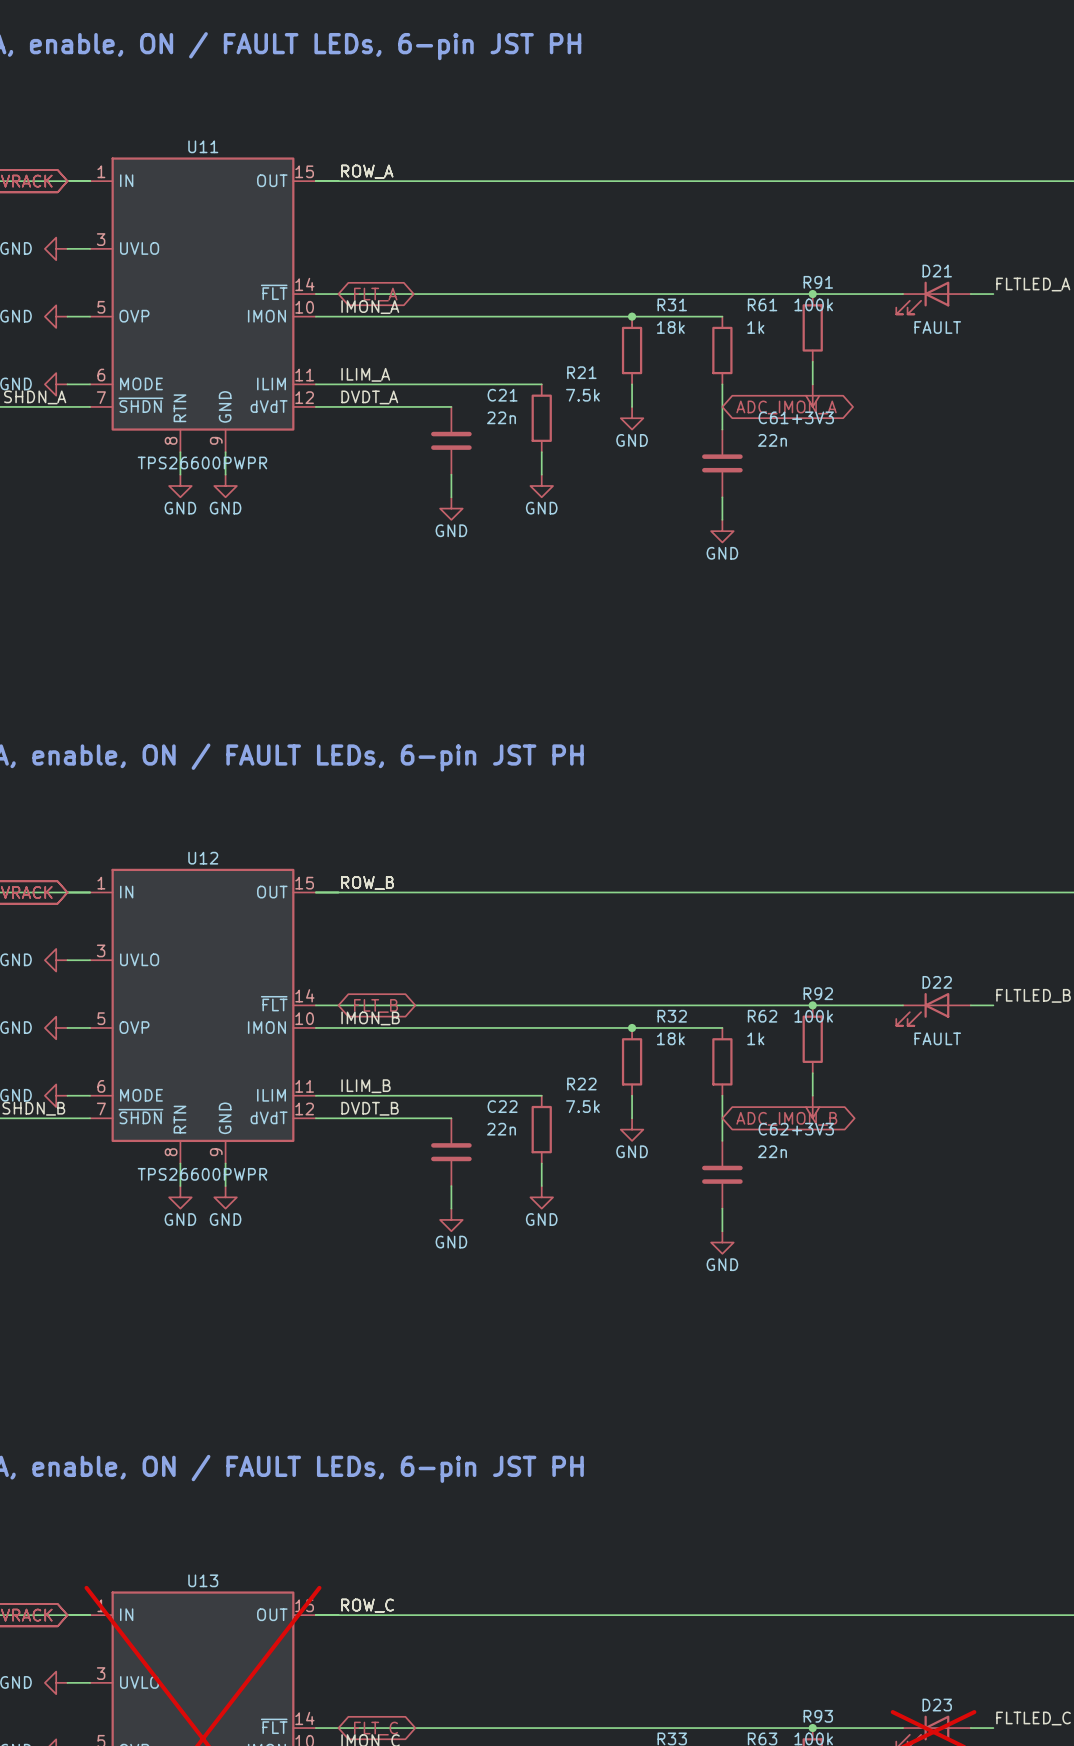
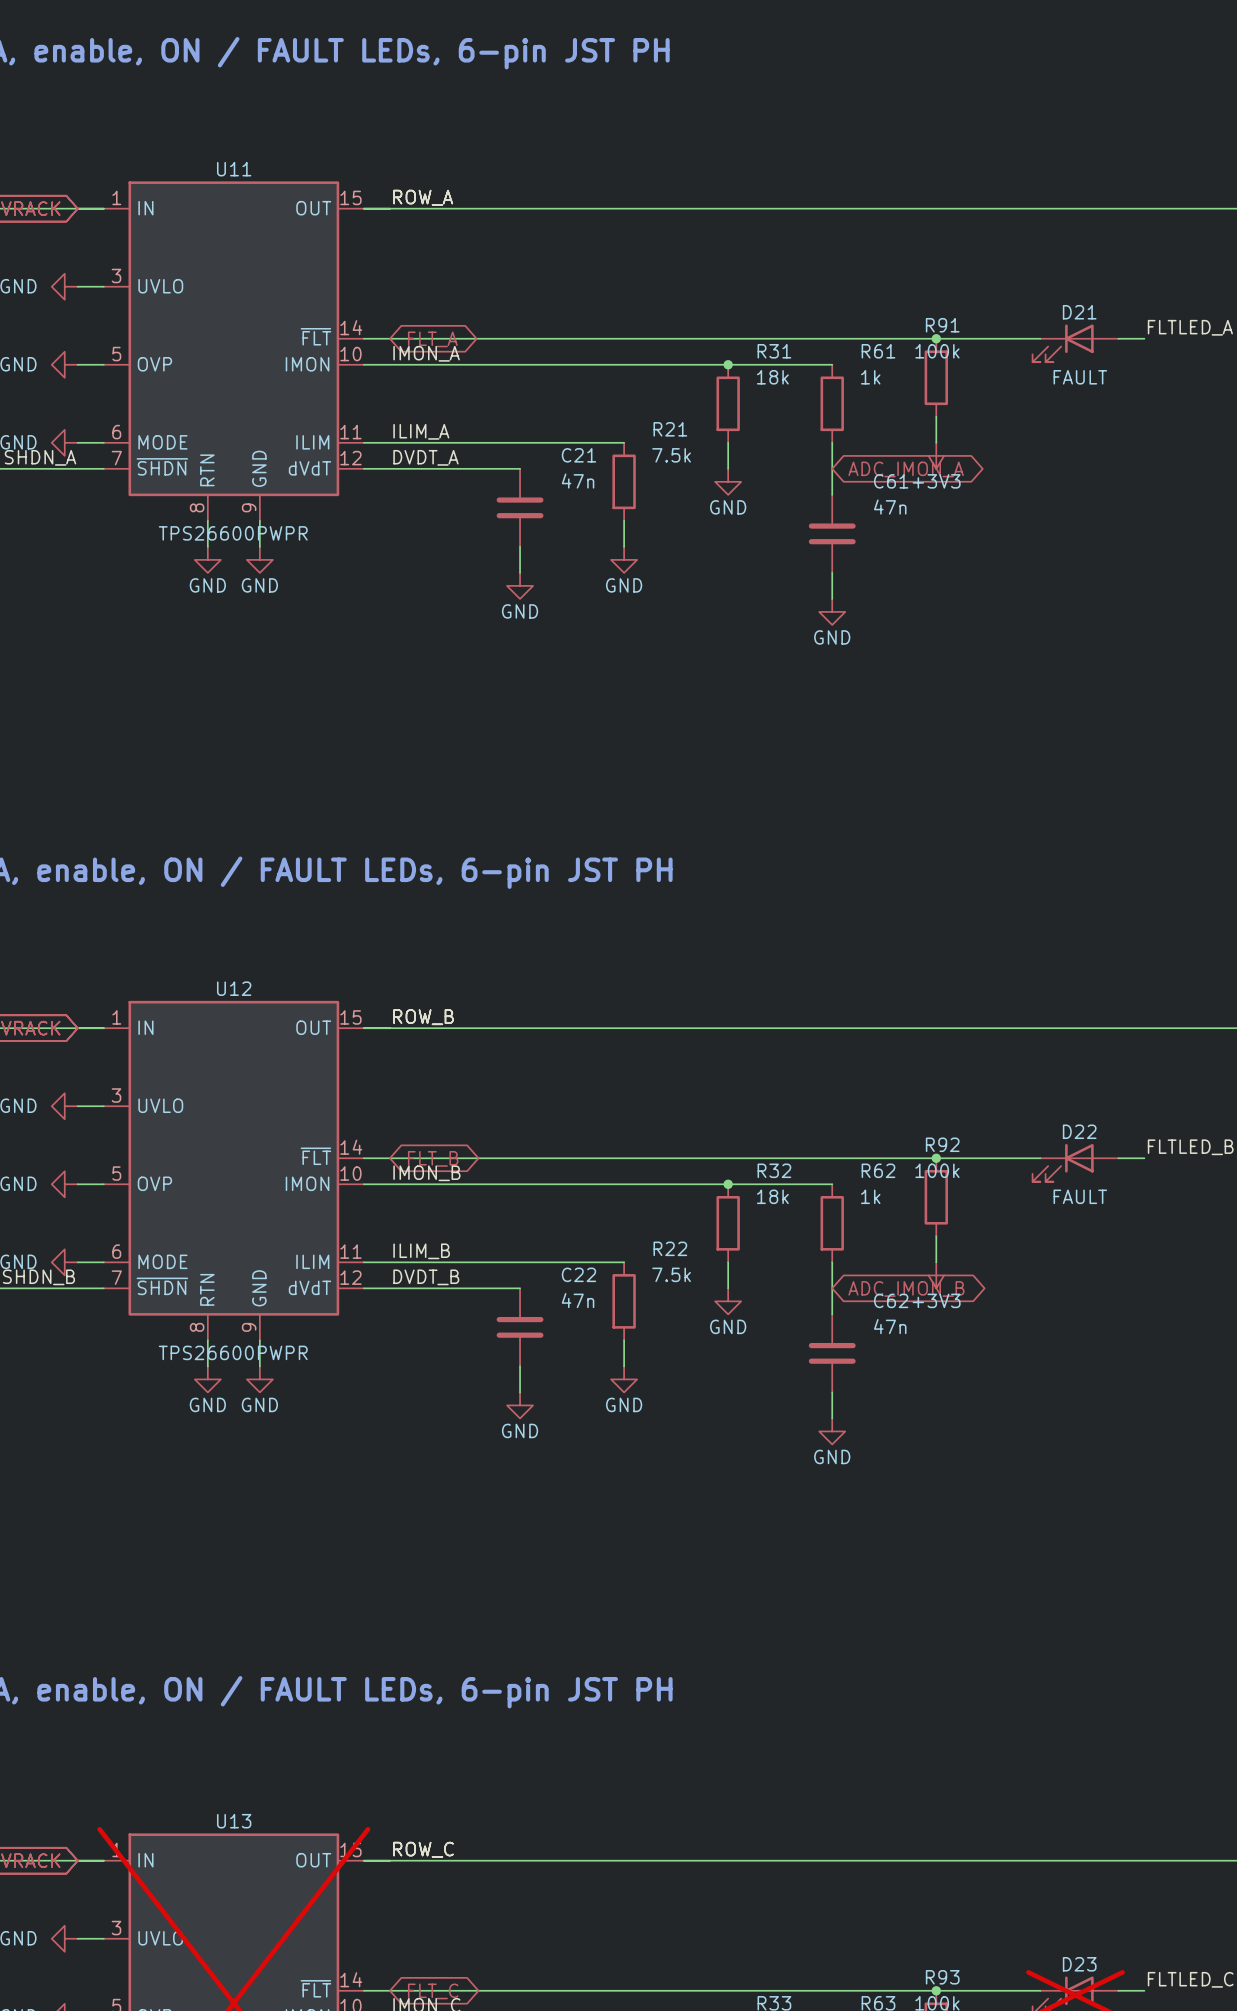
C21 value: 22n (501, 417) -> 47n (578, 481)
C61 value: 22n (772, 440) -> 47n (890, 507)
C22 value: 22n (501, 1129) -> 47n (578, 1300)
C62 value: 22n (772, 1151) -> 47n (890, 1326)

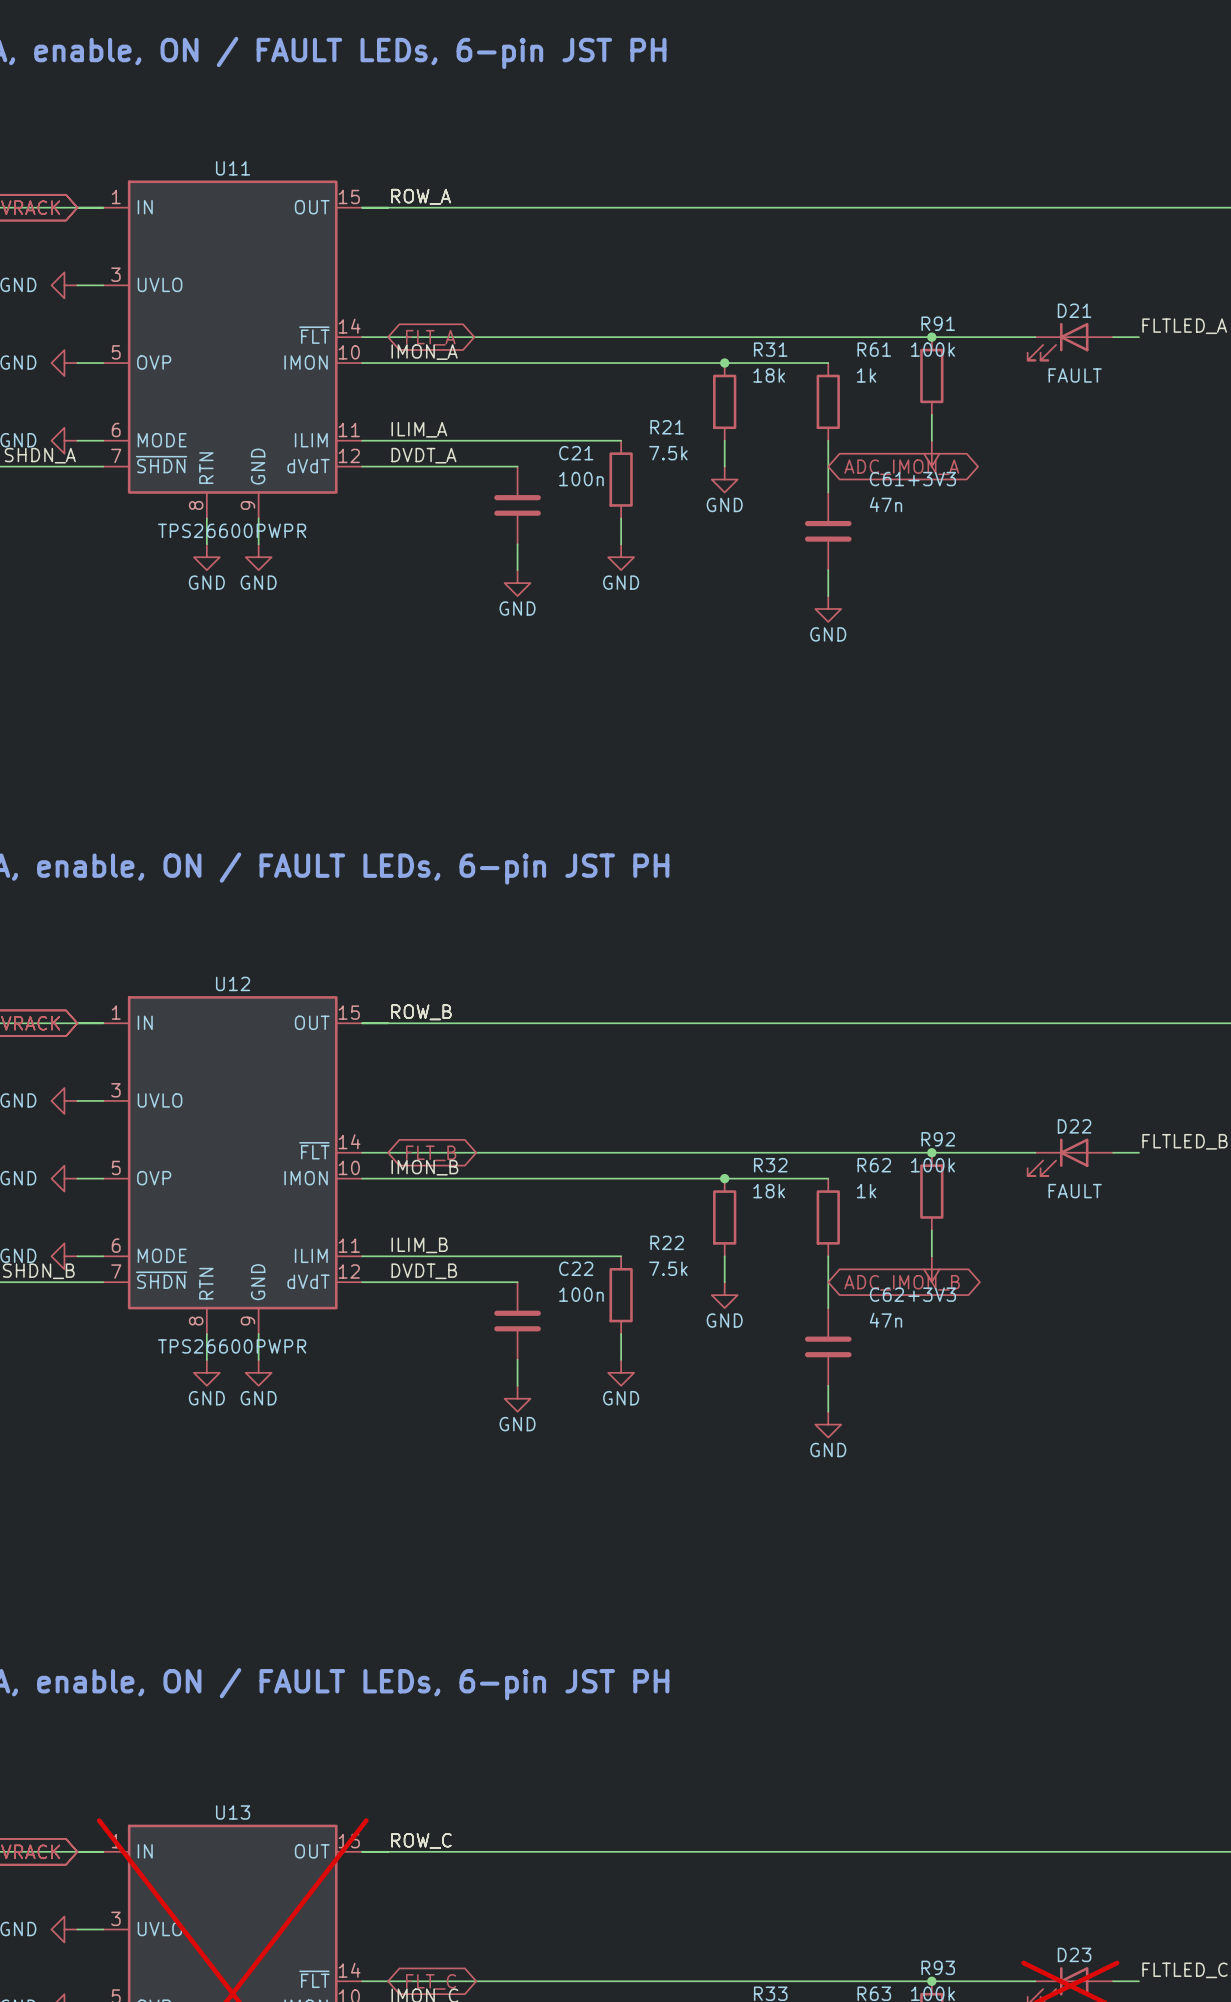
C21 value: 47n (578, 481) -> 100n (581, 479)
C22 value: 47n (578, 1300) -> 100n (581, 1294)

